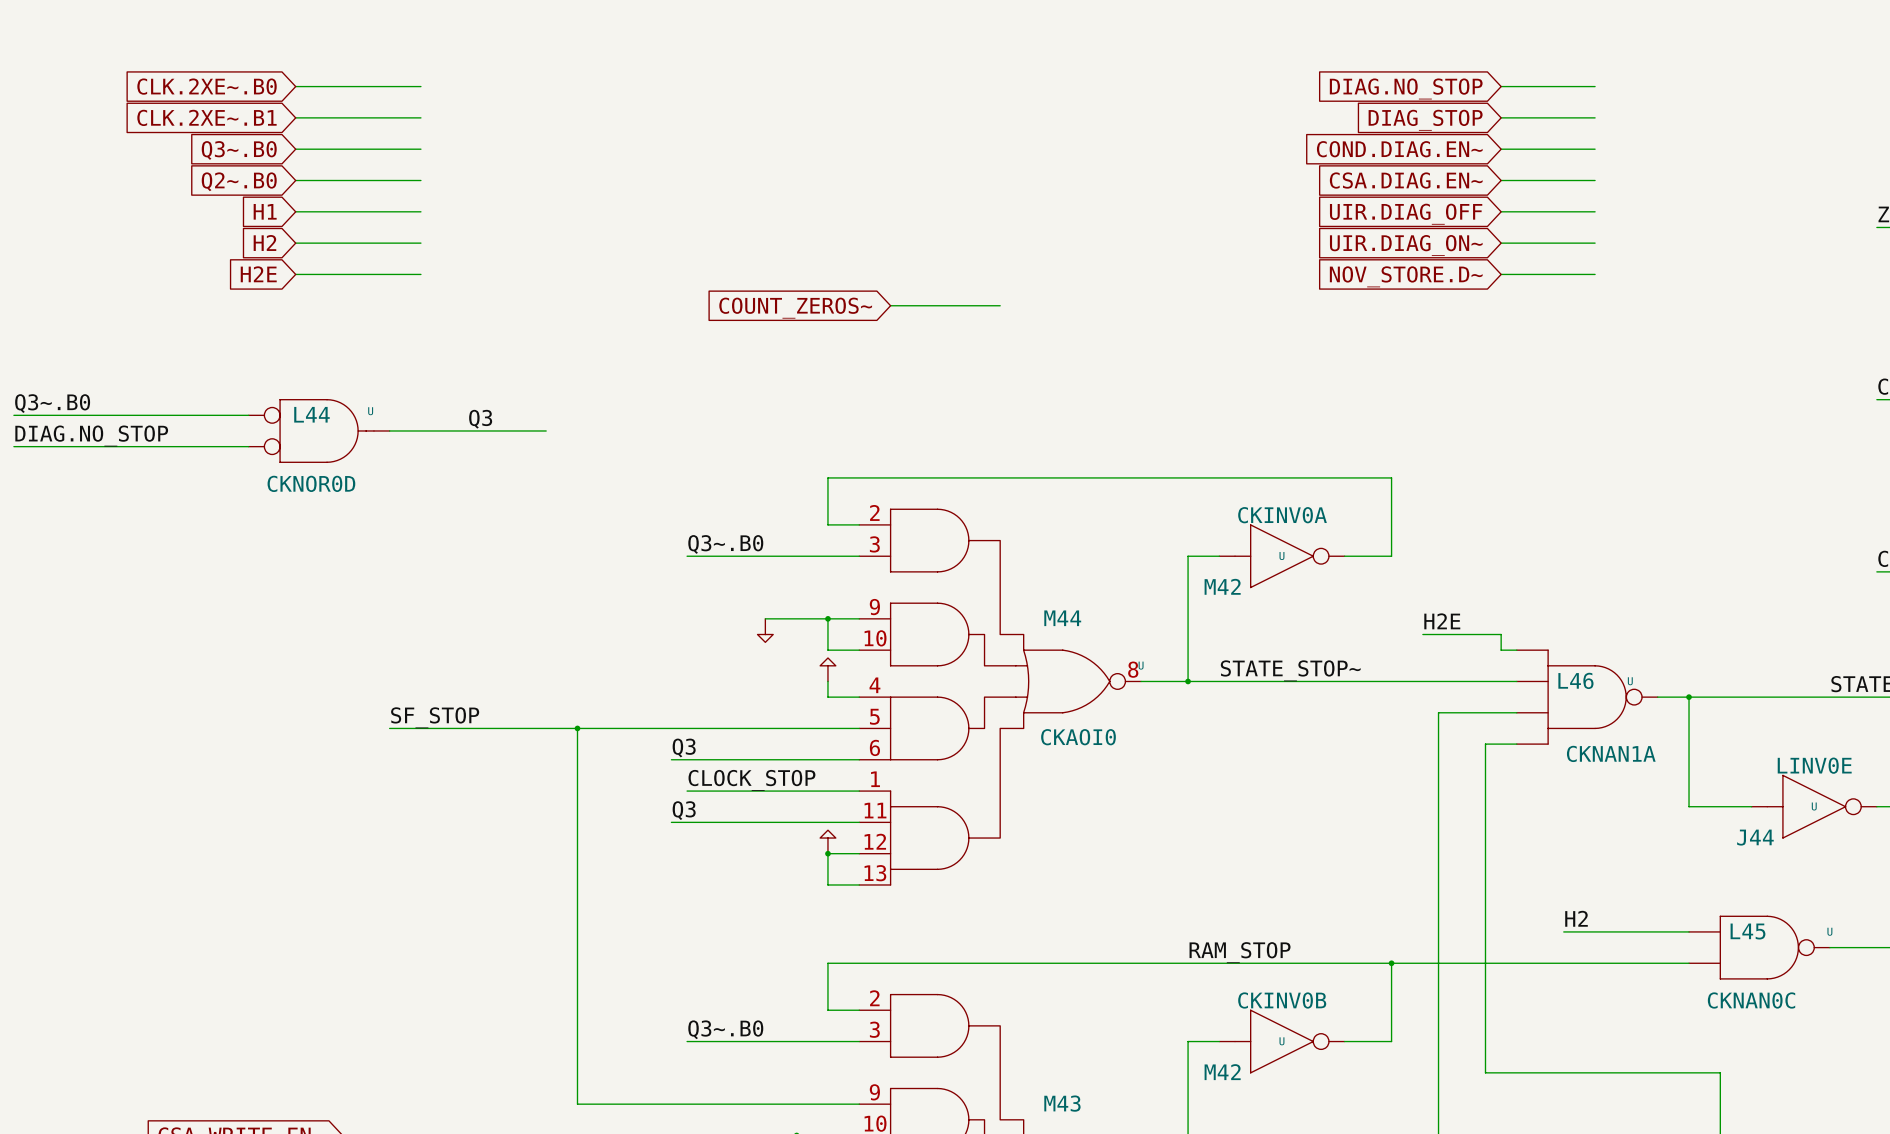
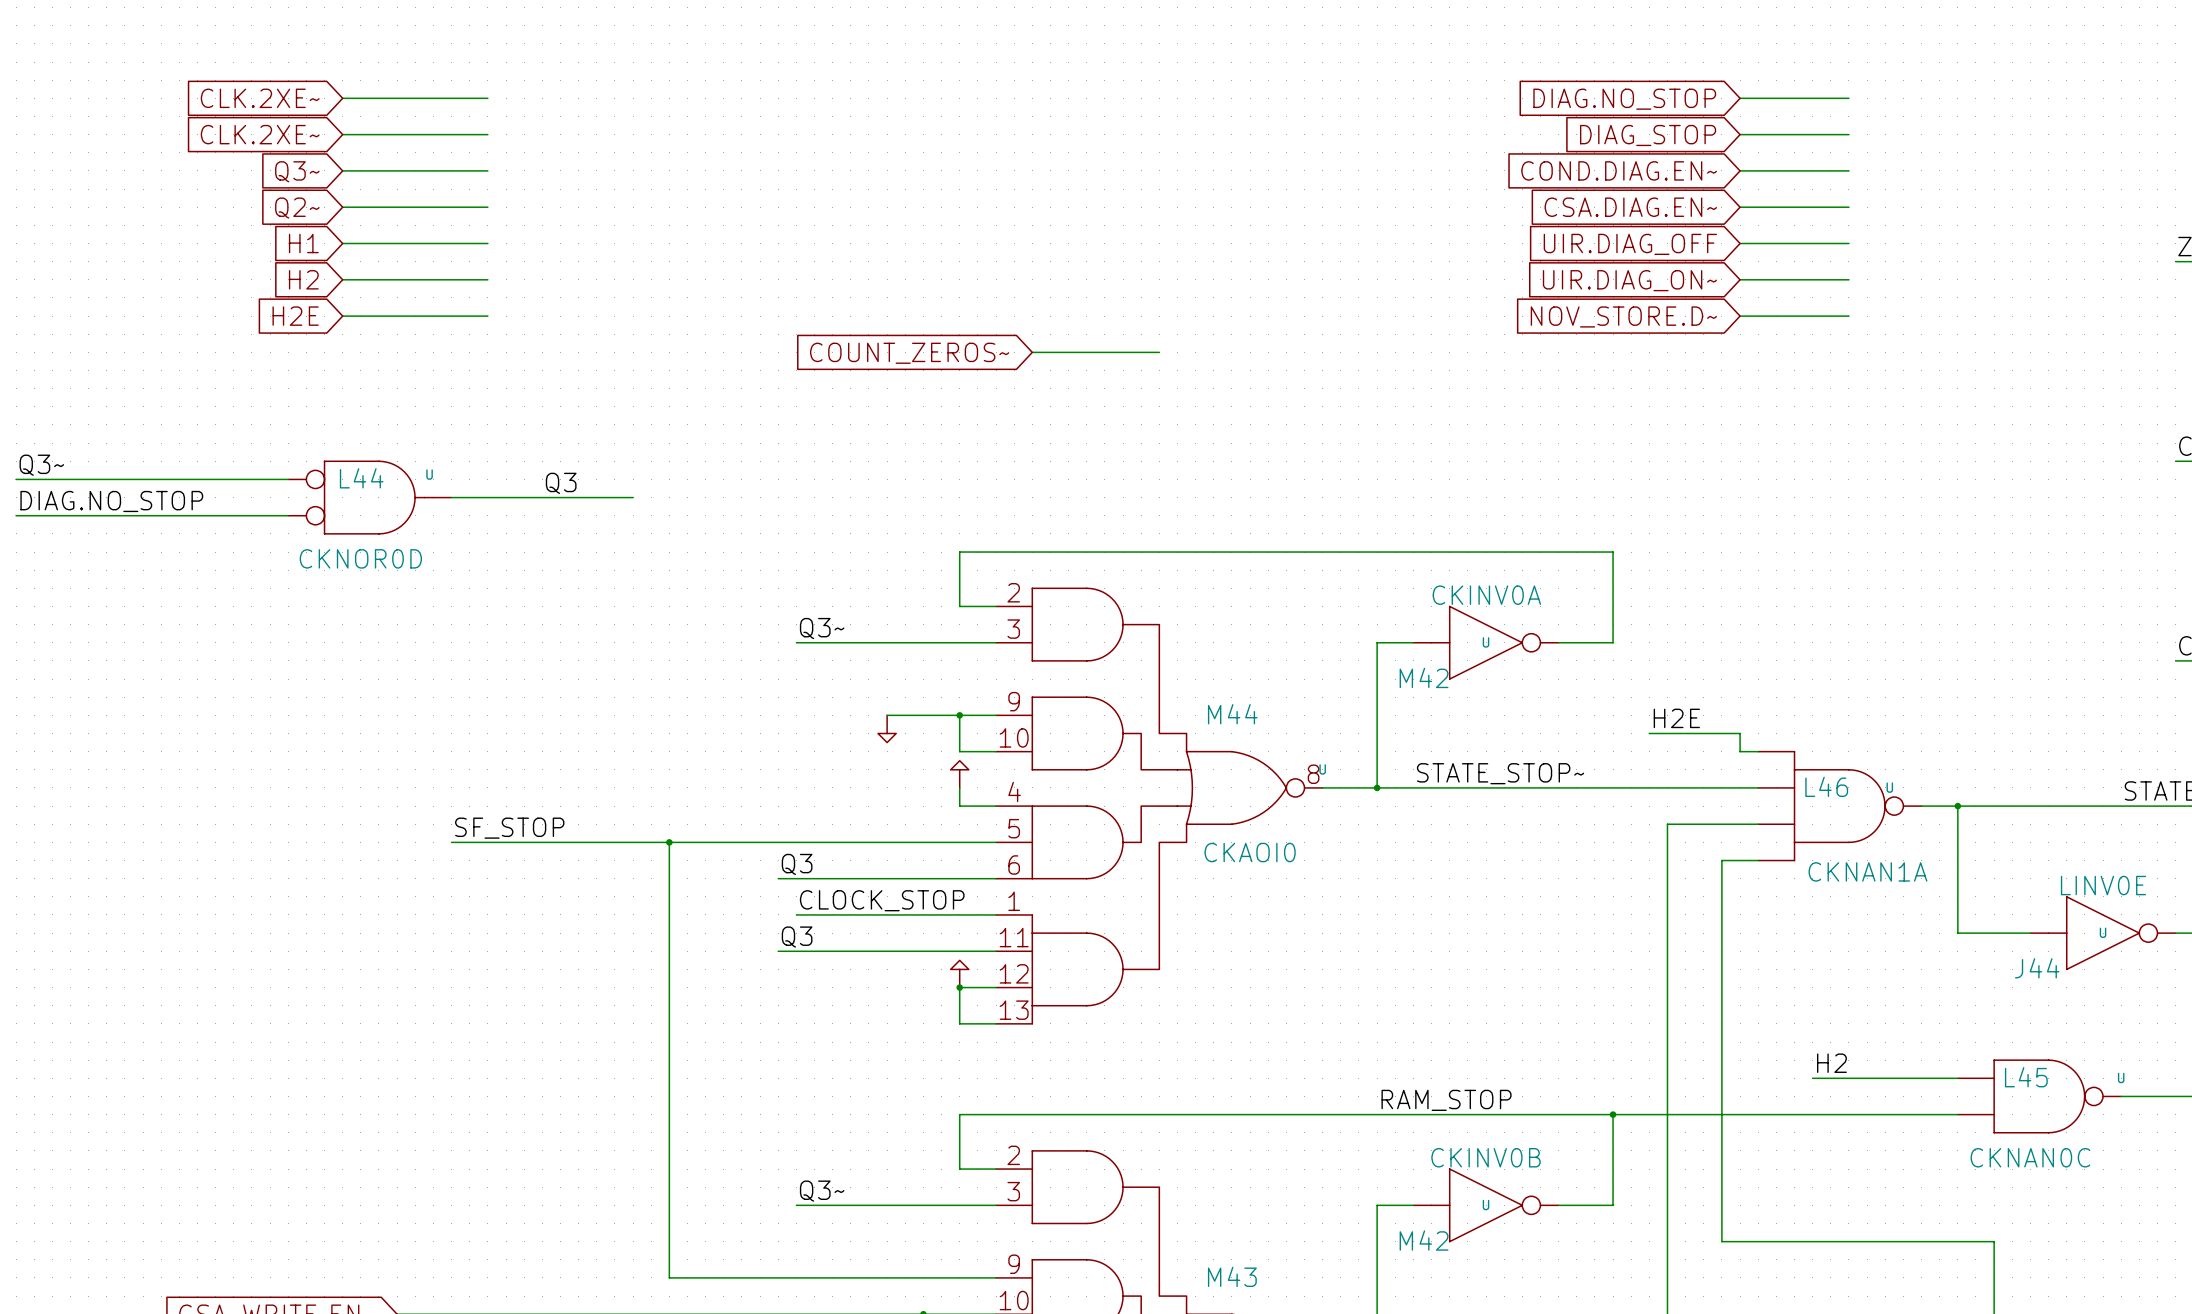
global label: CLK.2XE~.B0 (207, 86) -> CLK.2XE~ (260, 98)
global label: CLK.2XE~.B1 (206, 117) -> CLK.2XE~ (260, 134)
global label: Q3~.B0 (239, 150) -> Q3~ (297, 171)
global label: Q2~.B0 (239, 181) -> Q2~ (297, 208)
label: Q3~.B0 (52, 403) -> Q3~ (41, 465)
label: Q3~.B0 (725, 544) -> Q3~ (822, 628)
label: Q3~.B0 (725, 1029) -> Q3~ (822, 1191)

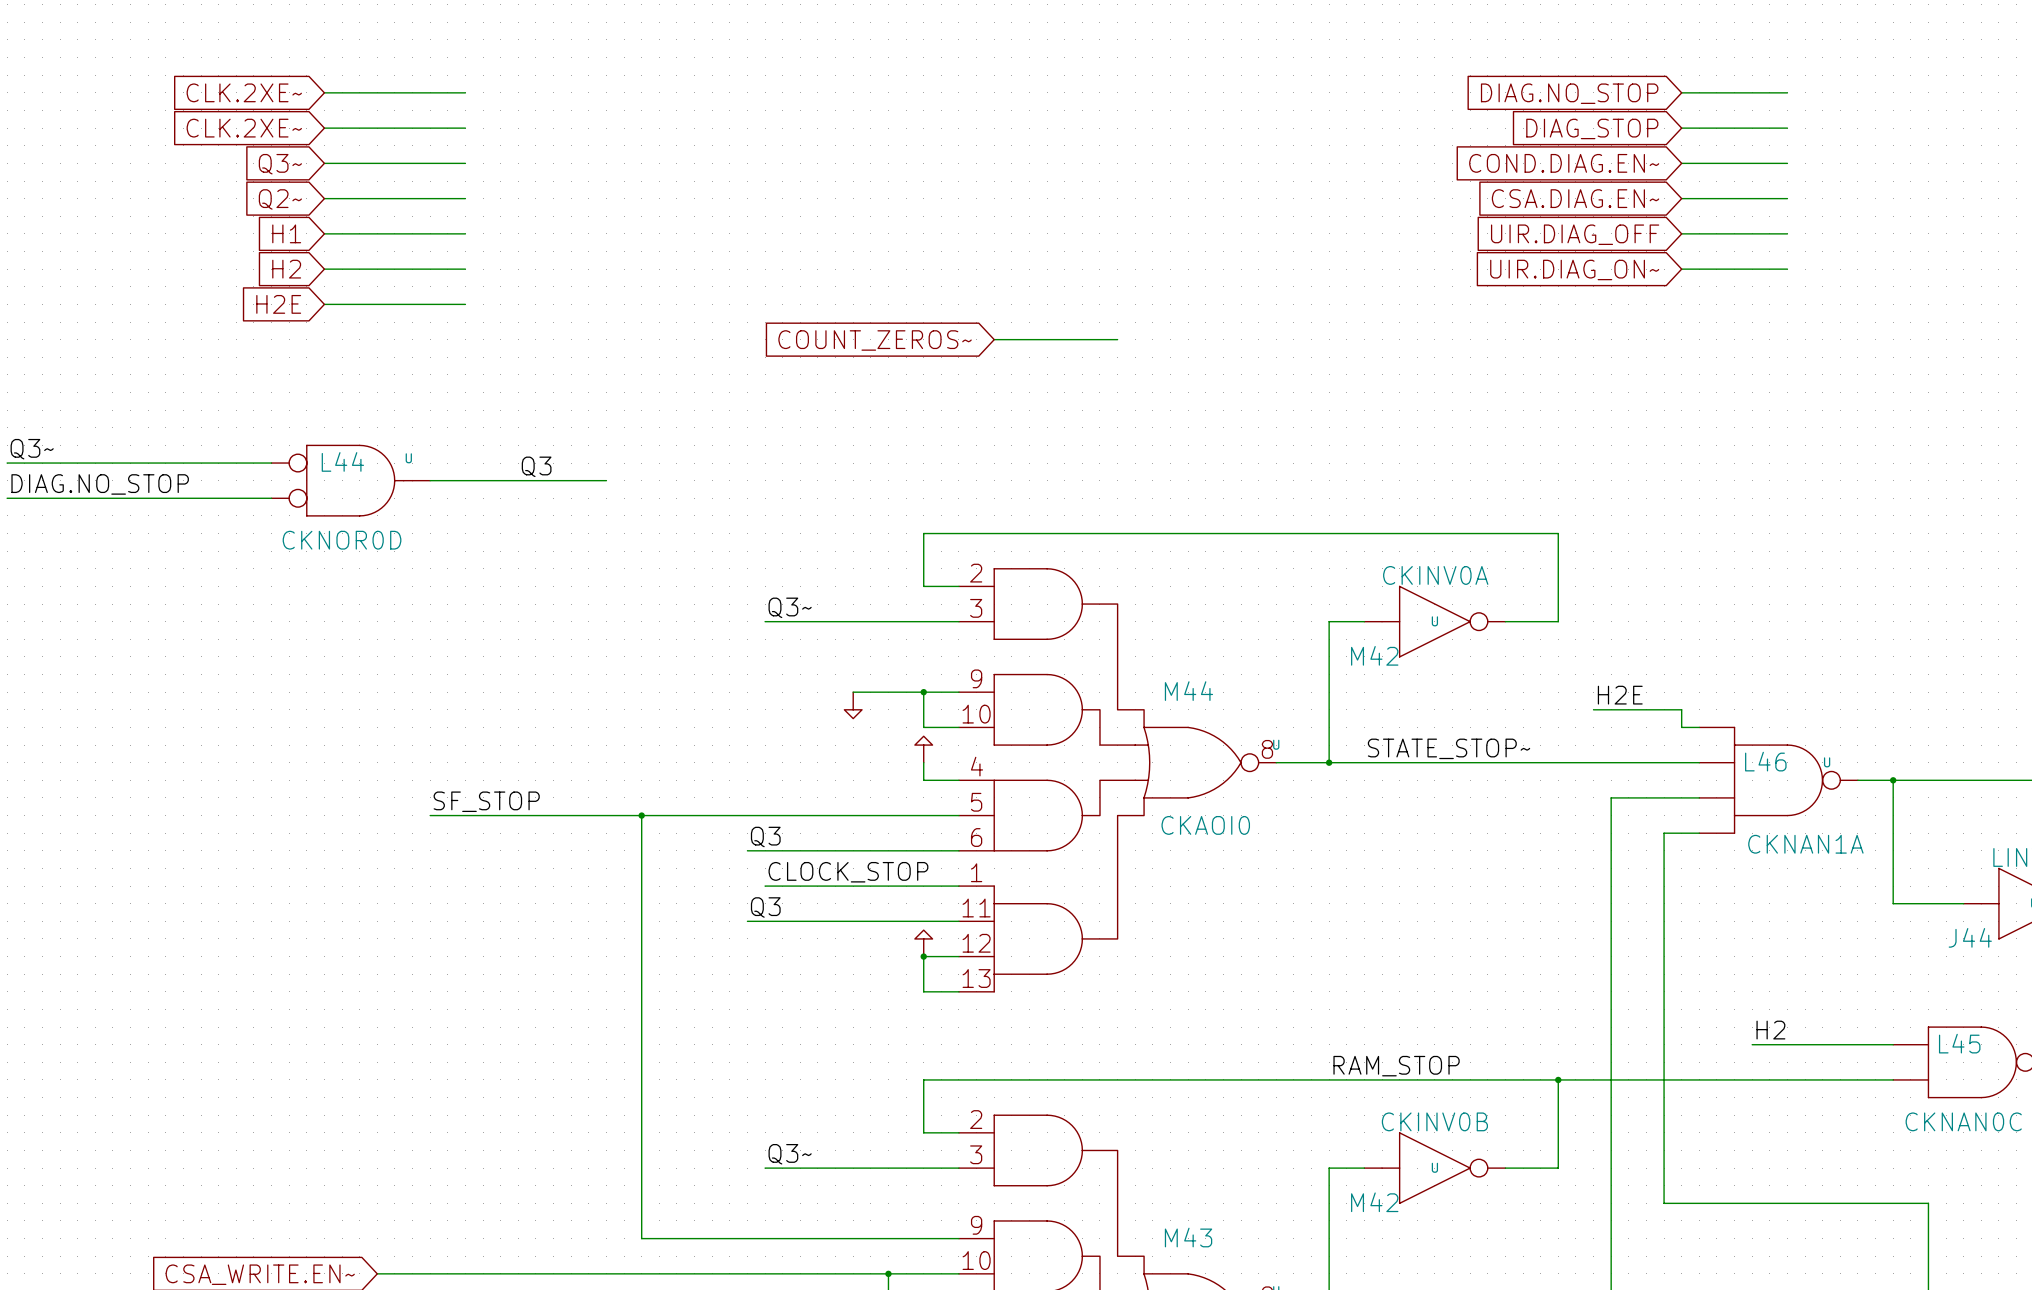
global label: NOV_STORE.D~ (1623, 316) -> none
wire: (1740, 316) (1848, 316) -> none

